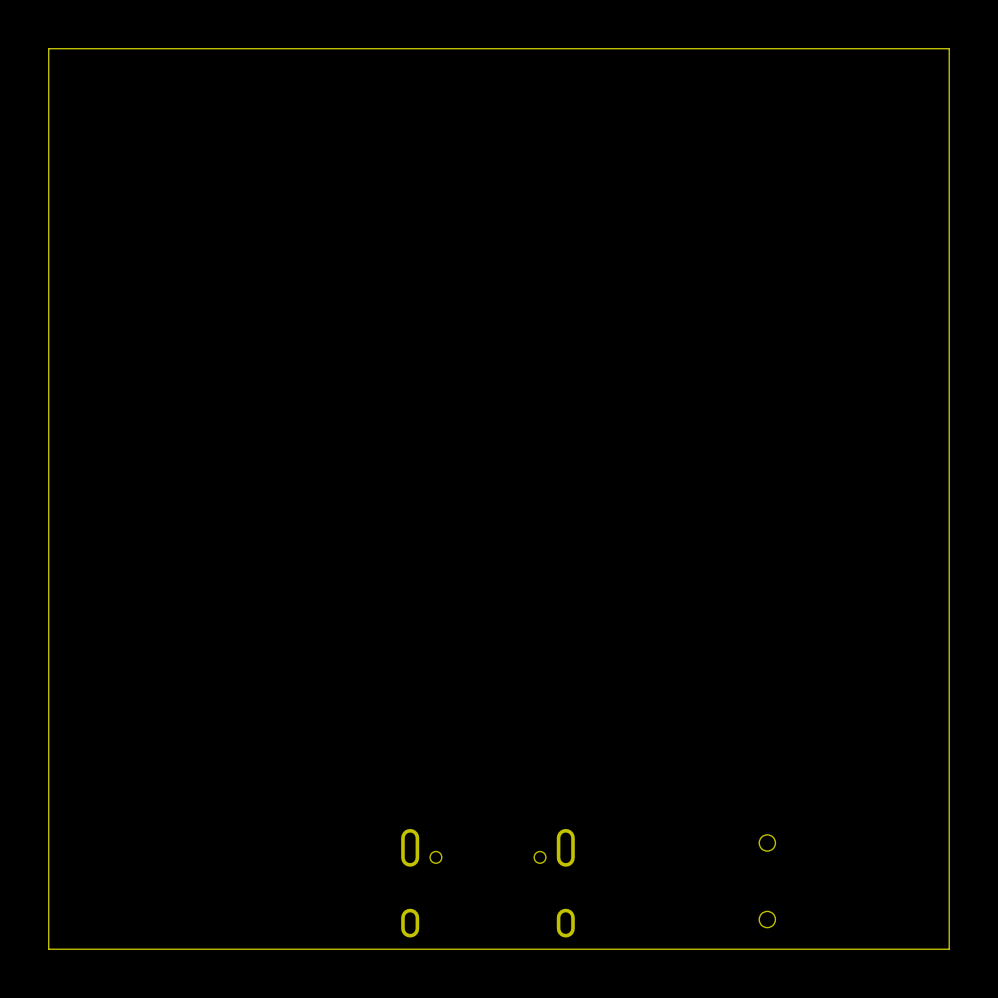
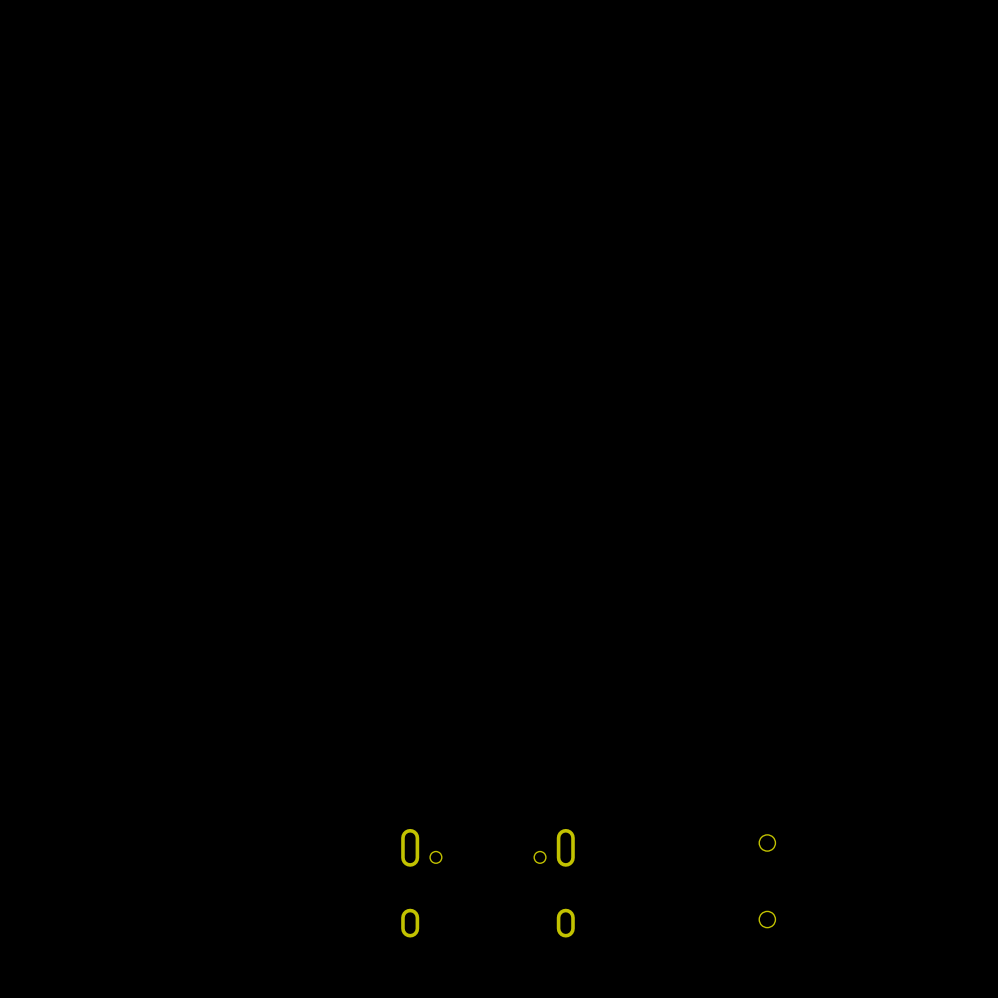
board edge: (949, 48) (48, 48) (48, 949) (949, 949) (949, 48) -> none

